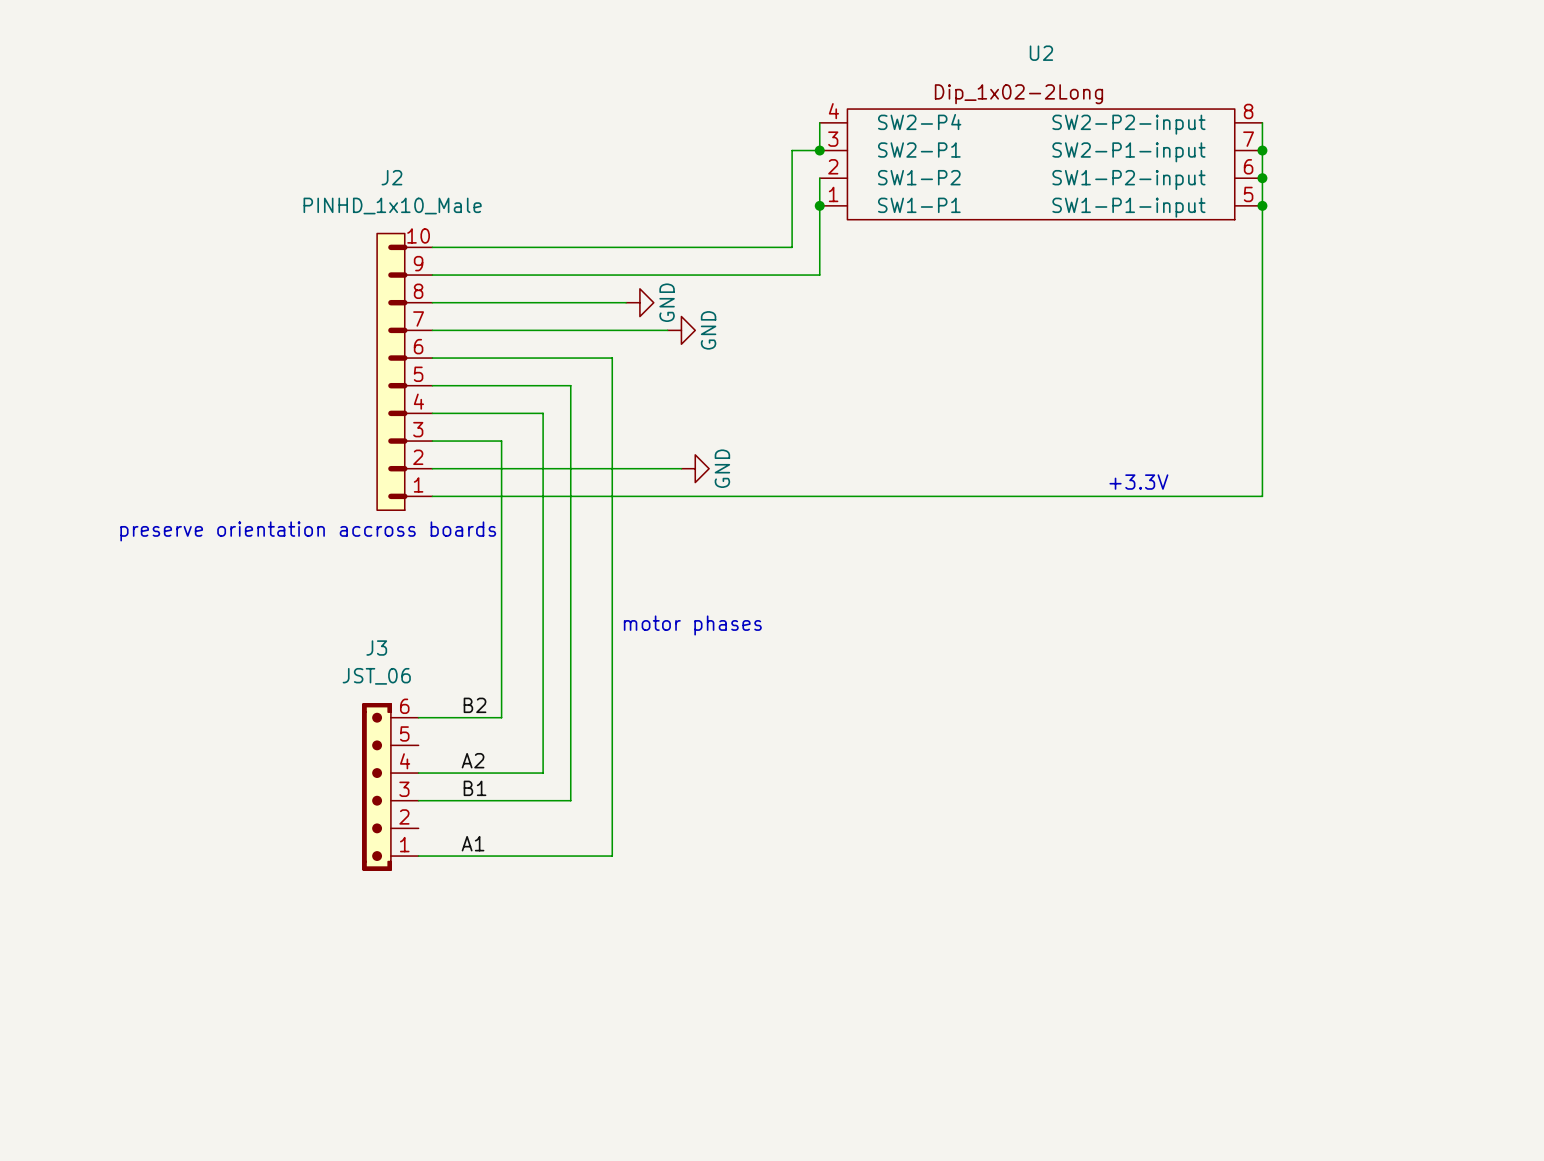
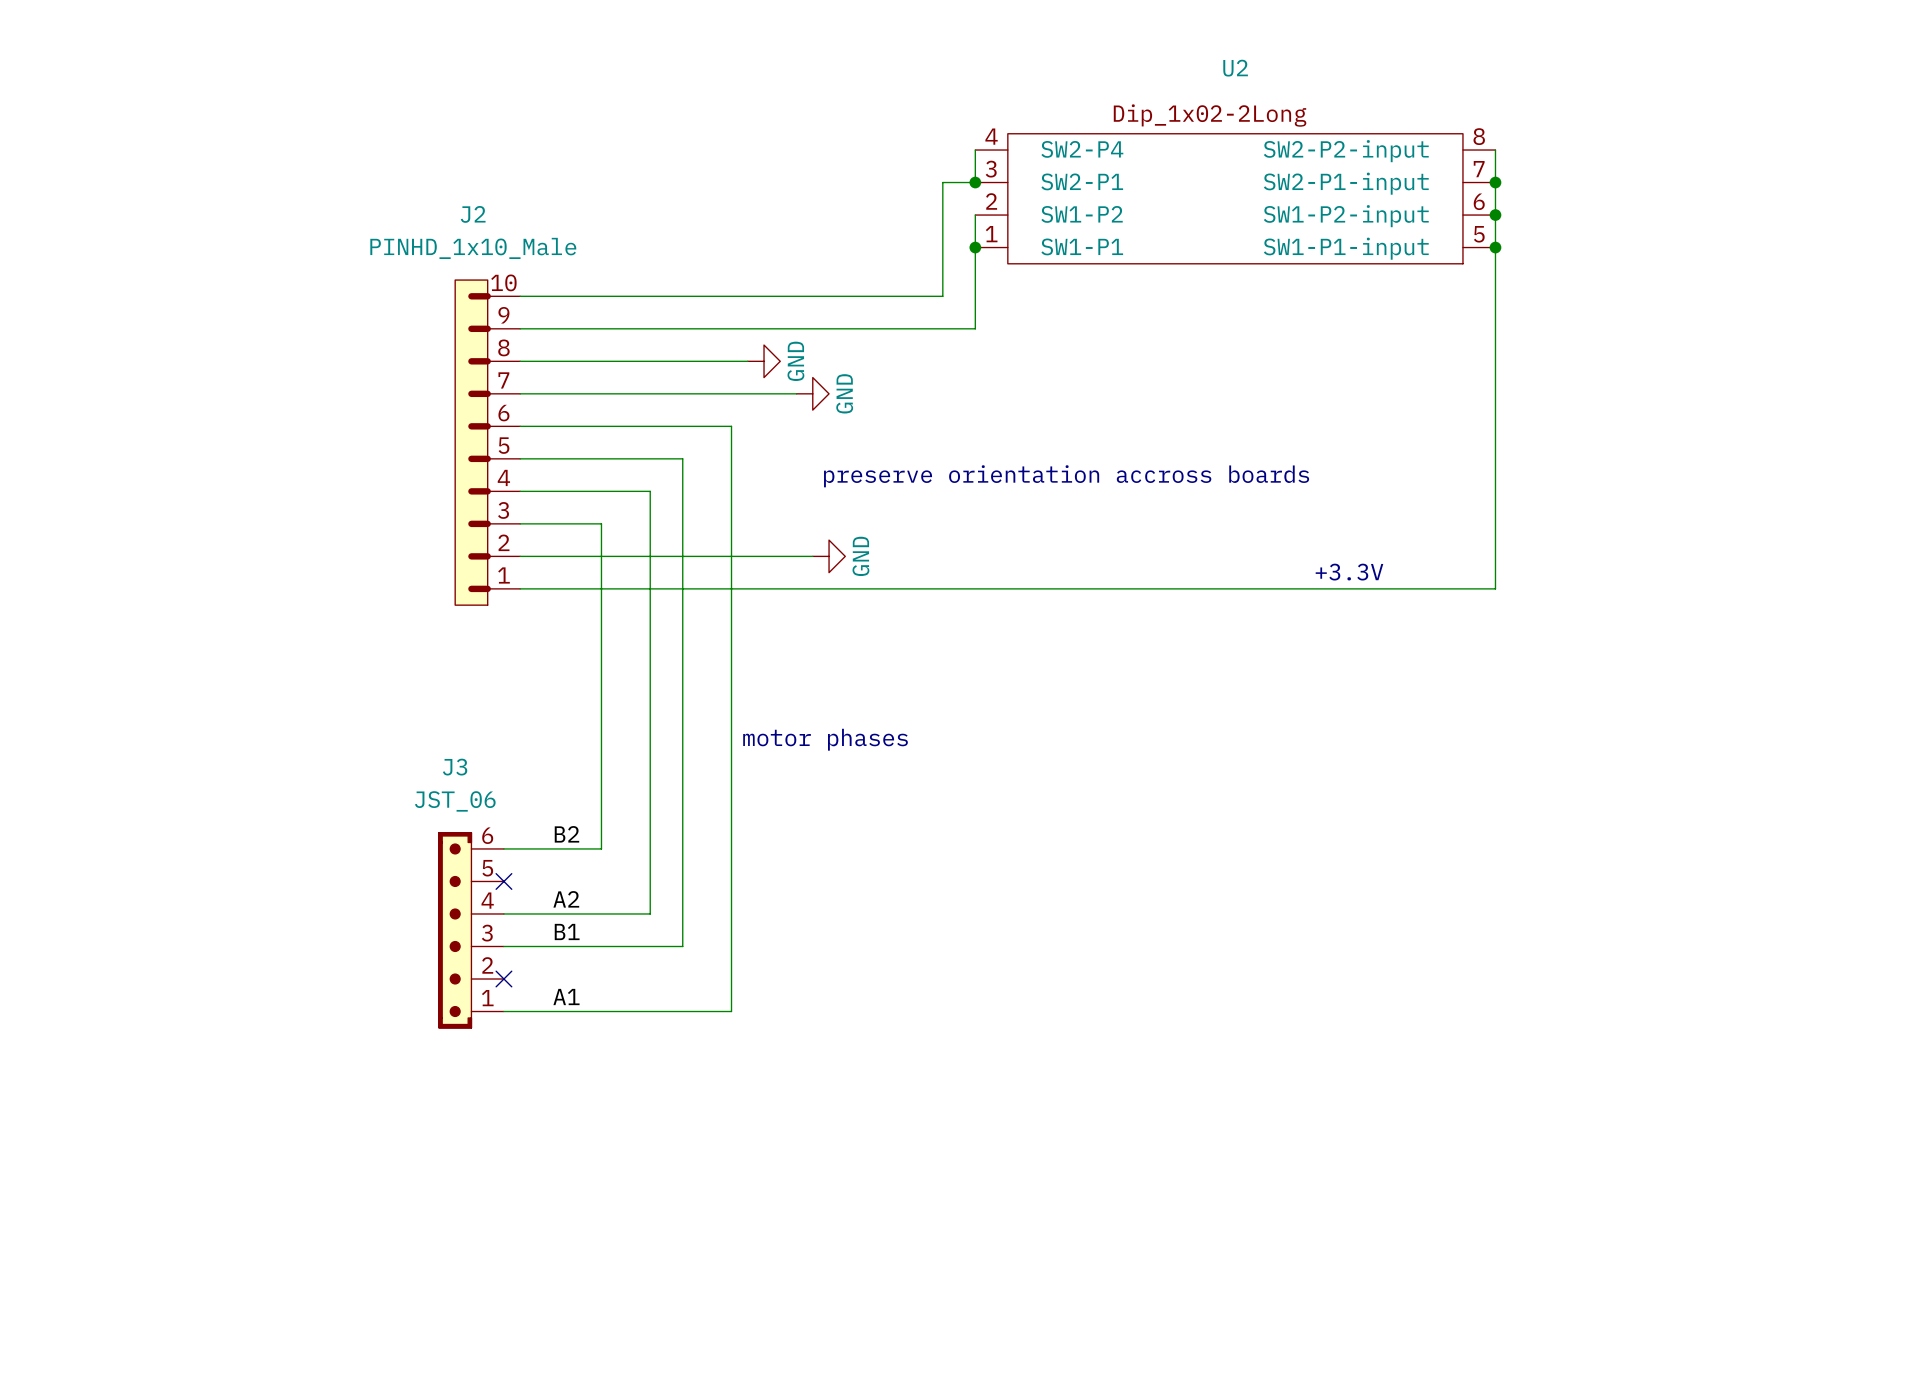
text: none -> preserve orientation accross boards (1066, 476)
text: preserve orientation accross boards (308, 531) -> none
no-connect mark: none -> (503, 881)
no-connect mark: none -> (503, 979)

